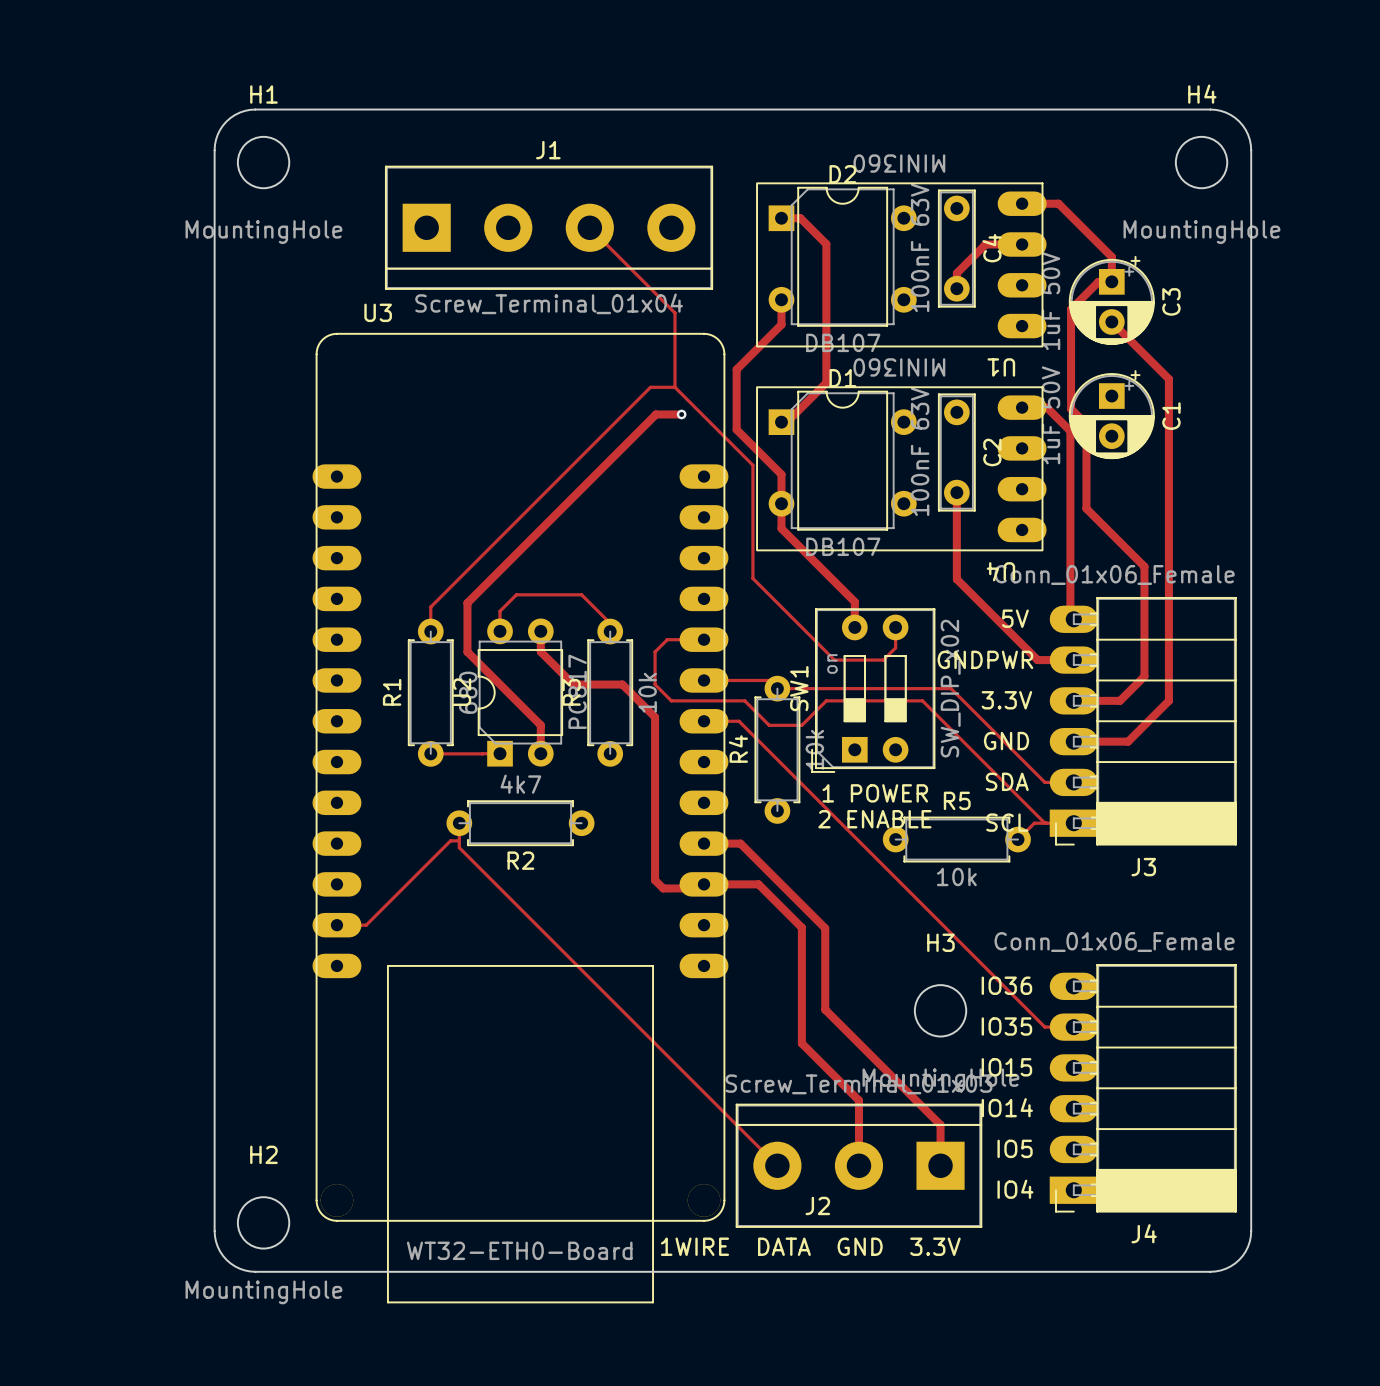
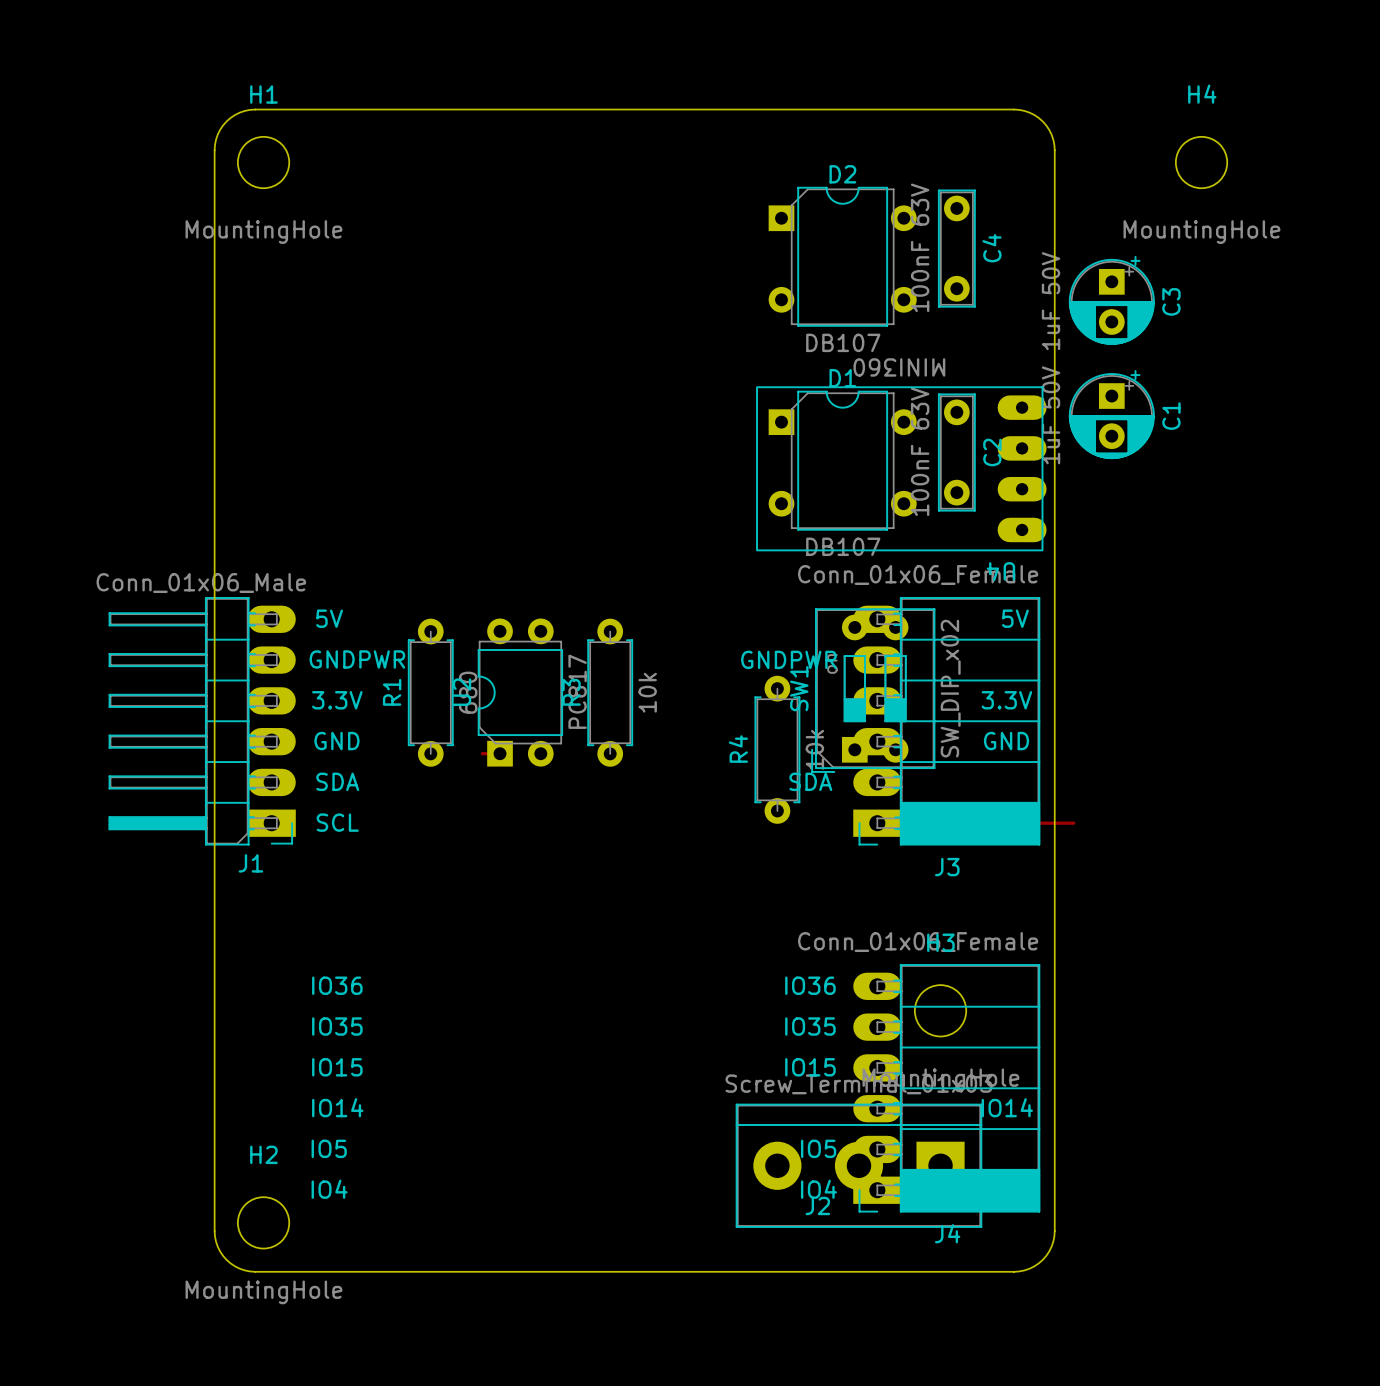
board edge: (1013, 109) (1215, 109) (1230, 114) (1239, 121) (1248, 134) (1251, 150) (1249, 1241) (1239, 1259) (1226, 1268) (1215, 1271) (1013, 1271) -> (1013, 109) (1029, 112) (1042, 121) (1051, 134) (1054, 150) (1054, 1231) (1051, 1246) (1042, 1259) (1029, 1268) (1013, 1271)
J1 name position: J1 (548, 150) -> J1 (250, 863)
J1 footprint: [384, 165, 714, 290] -> [108, 596, 296, 846]
track: (1022, 203) (1058, 203) (1111, 256) (1111, 281) (1098, 281) (1071, 309) (1071, 409) (1086, 424) (1086, 508) (1144, 566) (1144, 676) (1119, 700) (1073, 700) -> none
track: (781, 218) (800, 218) (826, 244) (826, 382) (786, 422) (781, 422) -> none
track: (589, 227) (674, 312) (674, 387) -> none
track: (1022, 244) (985, 244) (956, 273) (956, 288) -> none
U1: MINI360 (901, 264) -> none
track: (781, 299) (781, 324) (736, 369) (736, 429) (781, 474) (781, 528) (854, 601) (854, 627) -> none
J1 value: Screw_Terminal_01x04 (549, 303) -> Conn_01x06_Male (201, 583)
track: (1111, 321) (1168, 379) (1168, 700) (1128, 741) (1073, 741) -> none
track: (674, 387) (752, 465) (752, 578) (834, 660) (883, 660) (895, 647) (895, 627) -> none
track: (674, 387) (650, 387) (430, 607) (430, 631) -> none
track: (1022, 407) (1046, 407) (1070, 431) (1070, 615) (1073, 619) -> none
track: (681, 414) (655, 414) (467, 602) (467, 651) (540, 725) (540, 753) -> none
via: (681, 414) -> none
track: (956, 492) (956, 579) (1037, 660) (1073, 660) -> none
text: none -> 5V (329, 618)
track: (500, 631) (500, 611) (516, 594) (581, 594) (610, 623) (610, 631) -> none
track: (540, 631) (540, 651) (573, 684) (622, 684) (655, 717) (655, 880) (663, 888) (699, 888) (704, 884) (758, 884) (801, 927) (801, 1043) (858, 1100) (858, 1165) -> none
track: (704, 639) (667, 639) (655, 651) (655, 684) (671, 700) (744, 700) (769, 725) (801, 725) (826, 700) (922, 700) (1044, 823) -> none
text: none -> GNDPWR (357, 659)
text position: GNDPWR (985, 659) -> GNDPWR (788, 659)
track: (704, 680) (769, 680) (777, 688) (951, 688) (1044, 782) (1073, 782) -> none
text: none -> 3.3V (337, 700)
track: (704, 721) (739, 721) (1044, 1027) (1073, 1027) -> none
J3 position: (1143, 721) -> (946, 721)
text: none -> GND (336, 741)
track: (430, 753) (482, 753) -> none
text: none -> SDA (337, 781)
text position: SDA (1007, 781) -> SDA (810, 781)
text: 1 POWER (875, 793) -> none
U3: WT32-ETH0-Board (520, 818) -> none
text: 2 ENABLE (874, 819) -> none
text: none -> SCL (337, 822)
track: (459, 823) (459, 847) (777, 1165) -> none
R2: 4k7 (520, 823) -> none
R5: 10k (956, 839) -> none
track: (459, 840) (450, 840) (366, 925) (336, 925) -> none
track: (704, 843) (740, 843) (825, 928) (825, 1009) (940, 1124) (940, 1165) -> none
text: none -> IO36 (337, 985)
text position: IO36 (1006, 985) -> IO36 (810, 985)
text: none -> IO35 (337, 1026)
text position: IO35 (1006, 1026) -> IO35 (810, 1026)
text: none -> IO15 (337, 1067)
text position: IO15 (1006, 1067) -> IO15 (810, 1067)
J4 position: (1143, 1088) -> (946, 1088)
text: none -> IO14 (337, 1107)
text: none -> IO5 (329, 1148)
text position: IO5 (1015, 1148) -> IO5 (818, 1148)
text: none -> IO4 (329, 1189)
text position: IO4 (1015, 1189) -> IO4 (818, 1189)
text: 1WIRE DATA GND 3.3V (810, 1246) -> none

